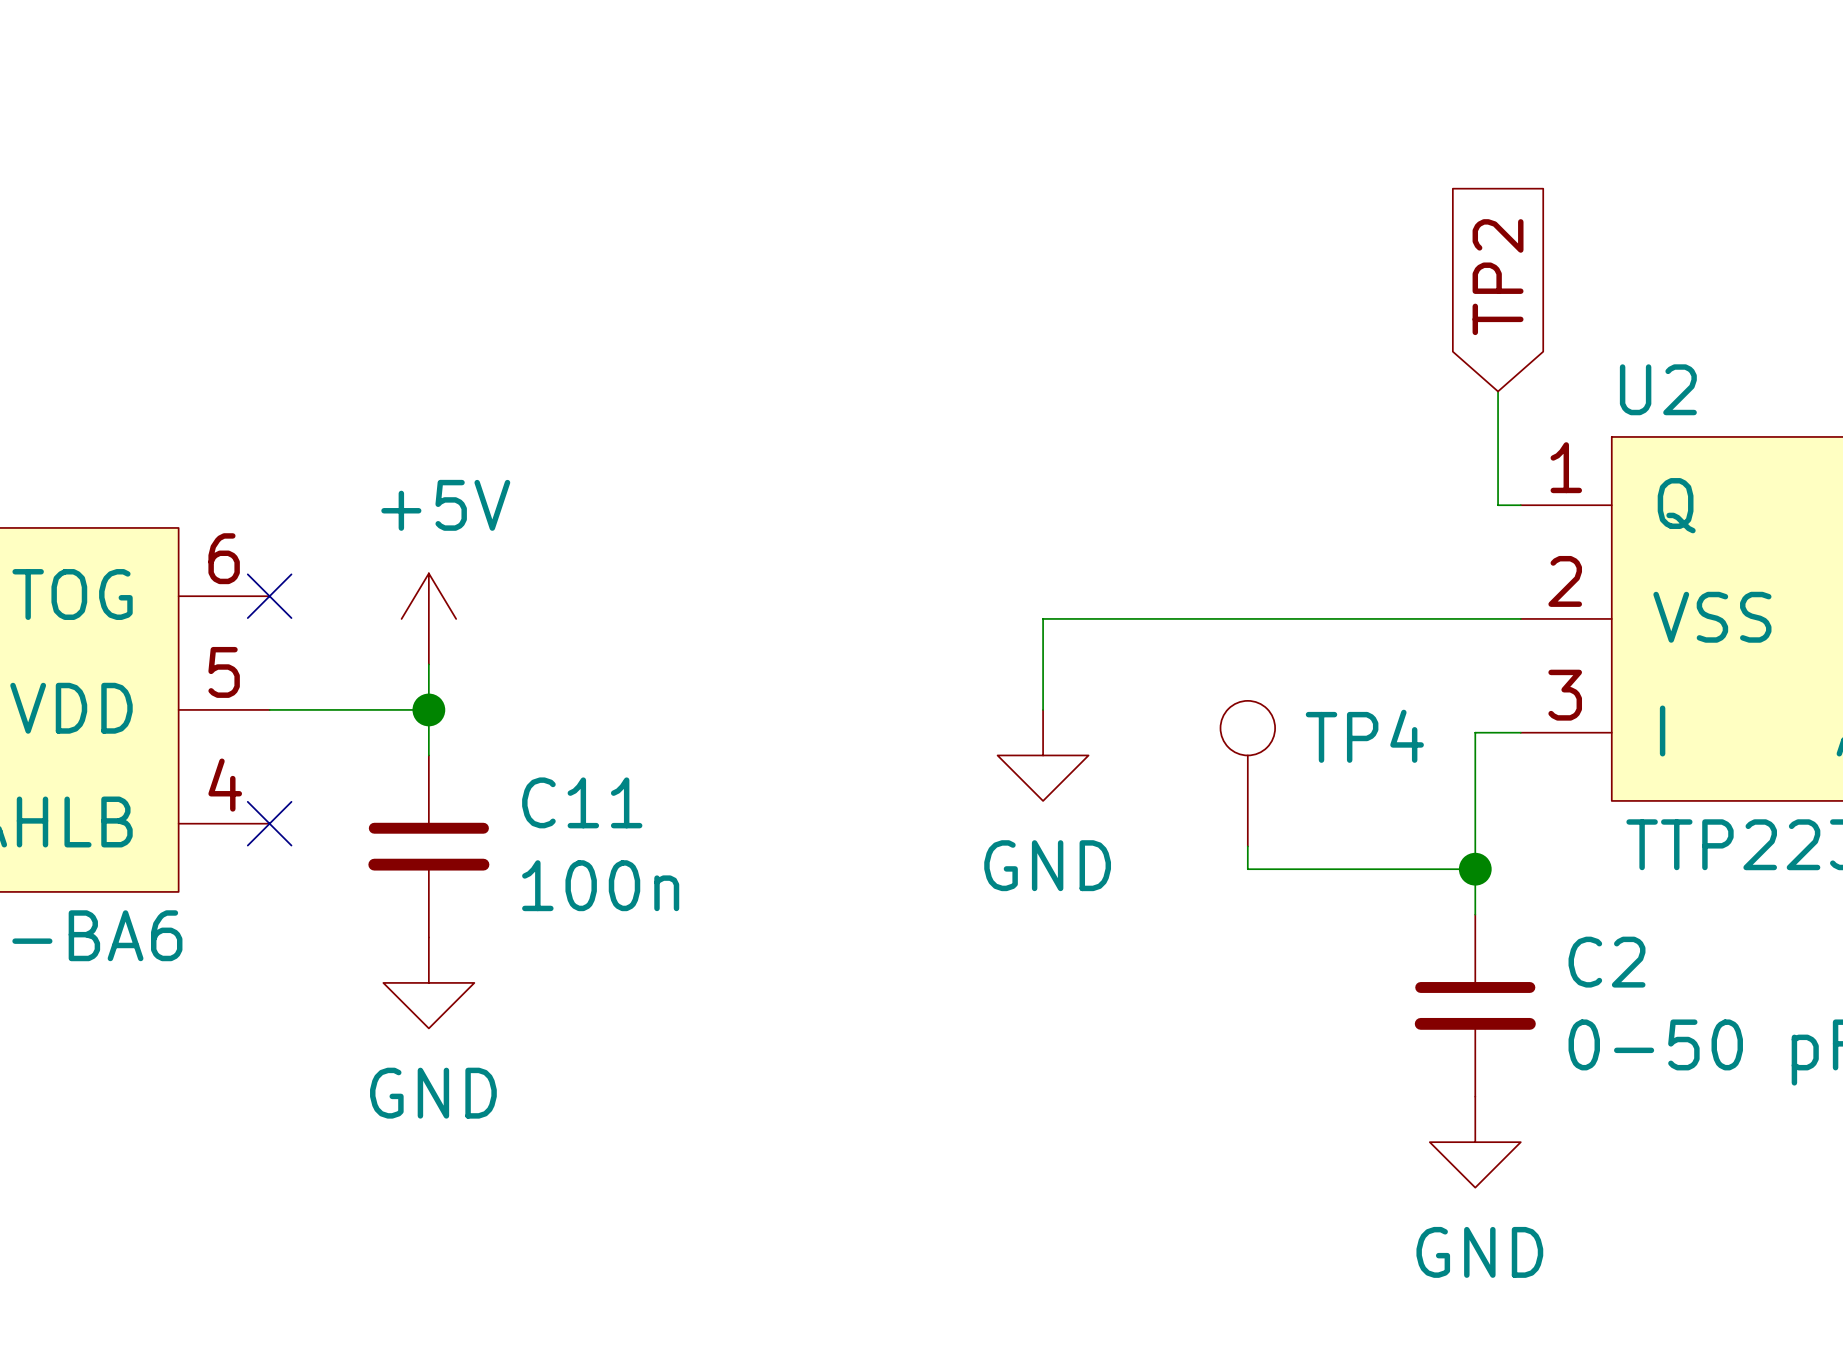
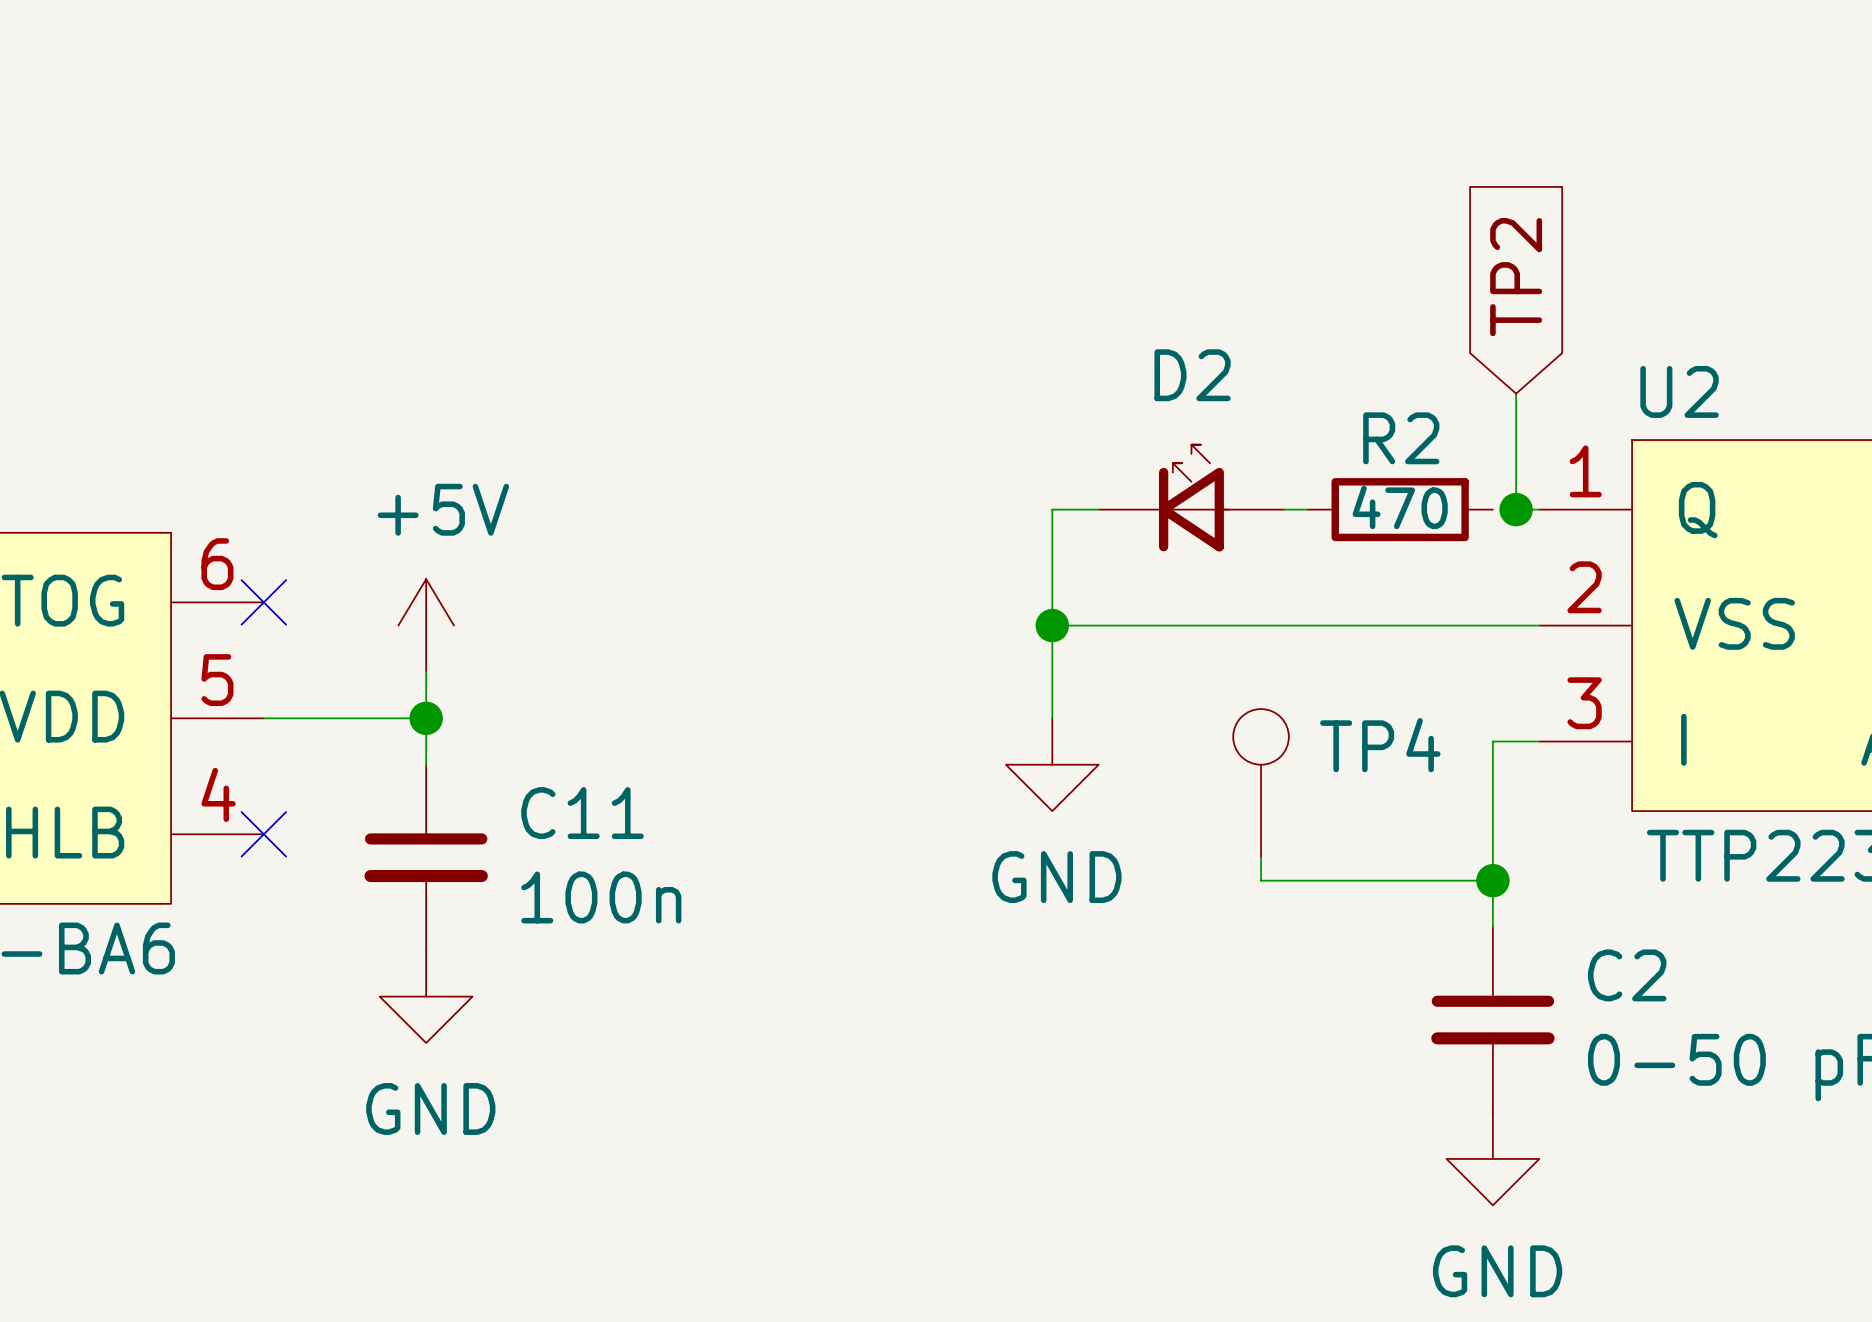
D2: none -> (1191, 498)
wire: none -> (1098, 509) (1052, 509) (1052, 625)
wire: none -> (1284, 509) (1307, 509)
R2: none -> 470 (1400, 509)
junction: none -> (1516, 509)
junction: none -> (1052, 625)

